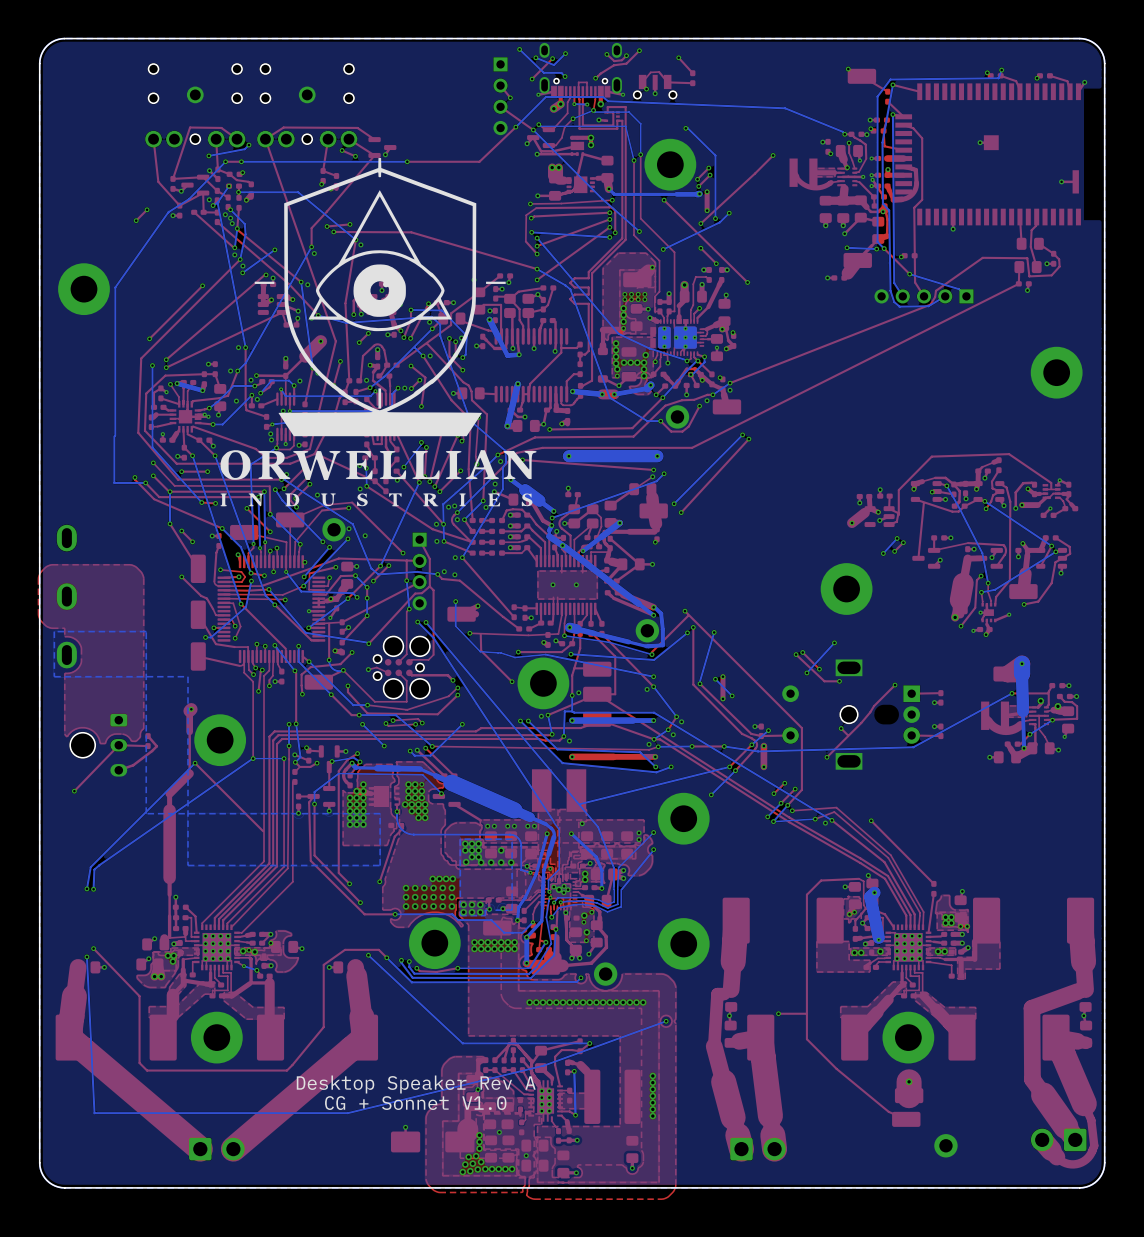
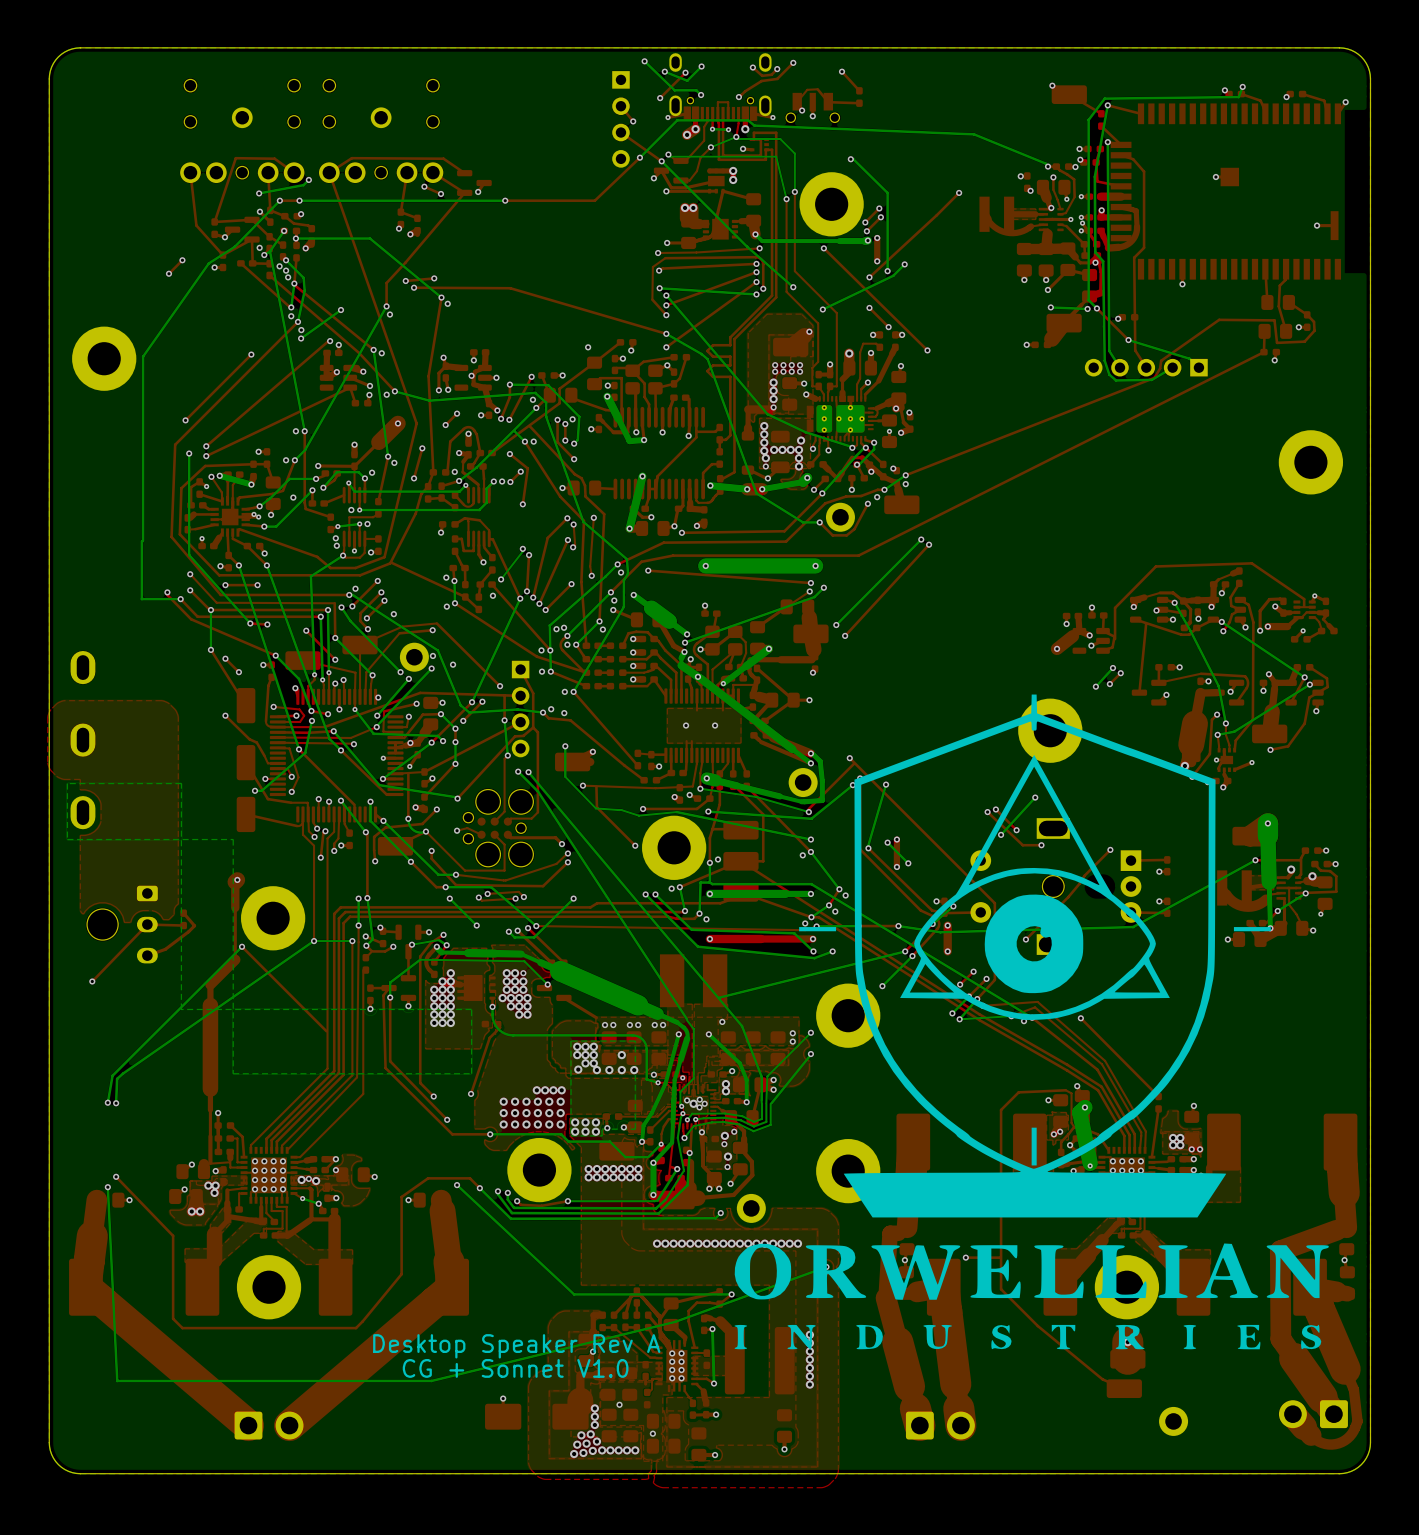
drawing: [220, 158, 537, 507] -> none
via: (251, 380) -> none
via: (257, 399) -> none
drawing: none -> [734, 694, 1329, 1350]

